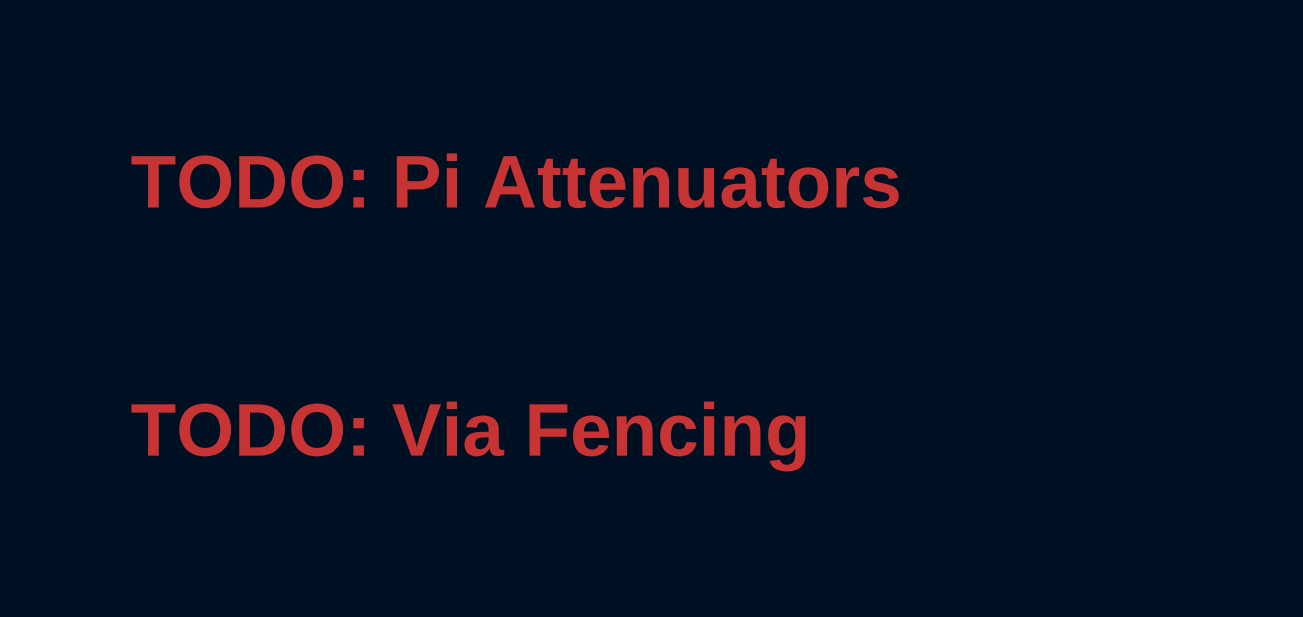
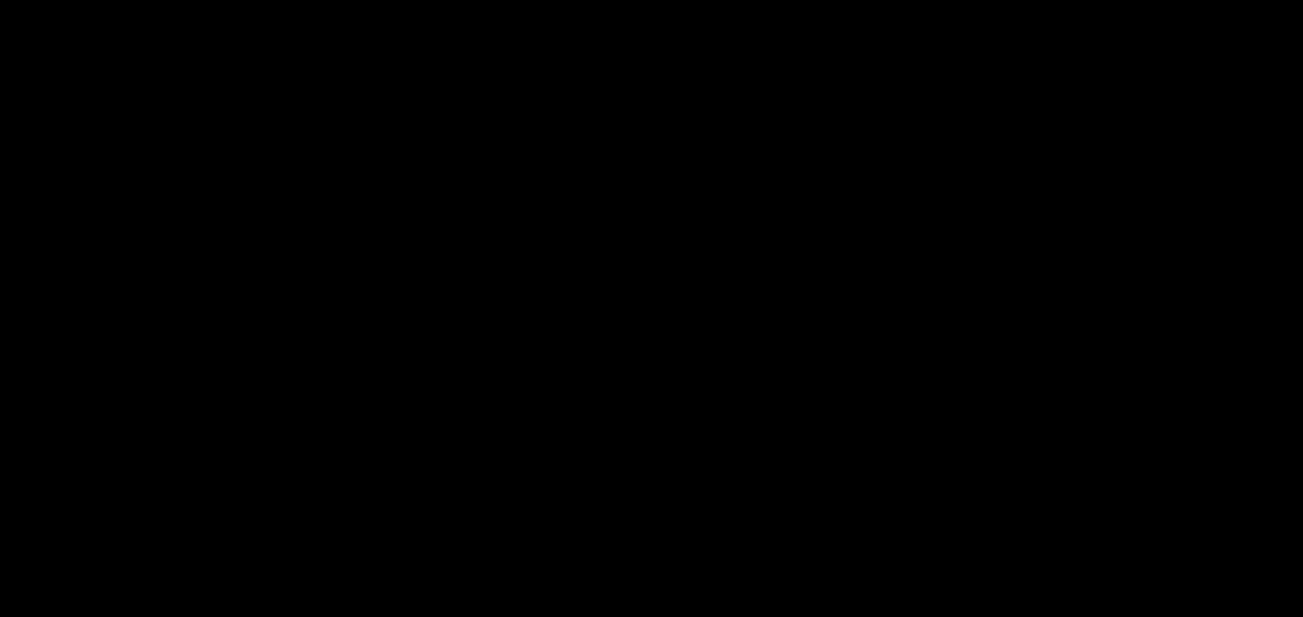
text: TODO: Pi Attenuators (515, 180) -> none
text: TODO: Via Fencing (468, 436) -> none

